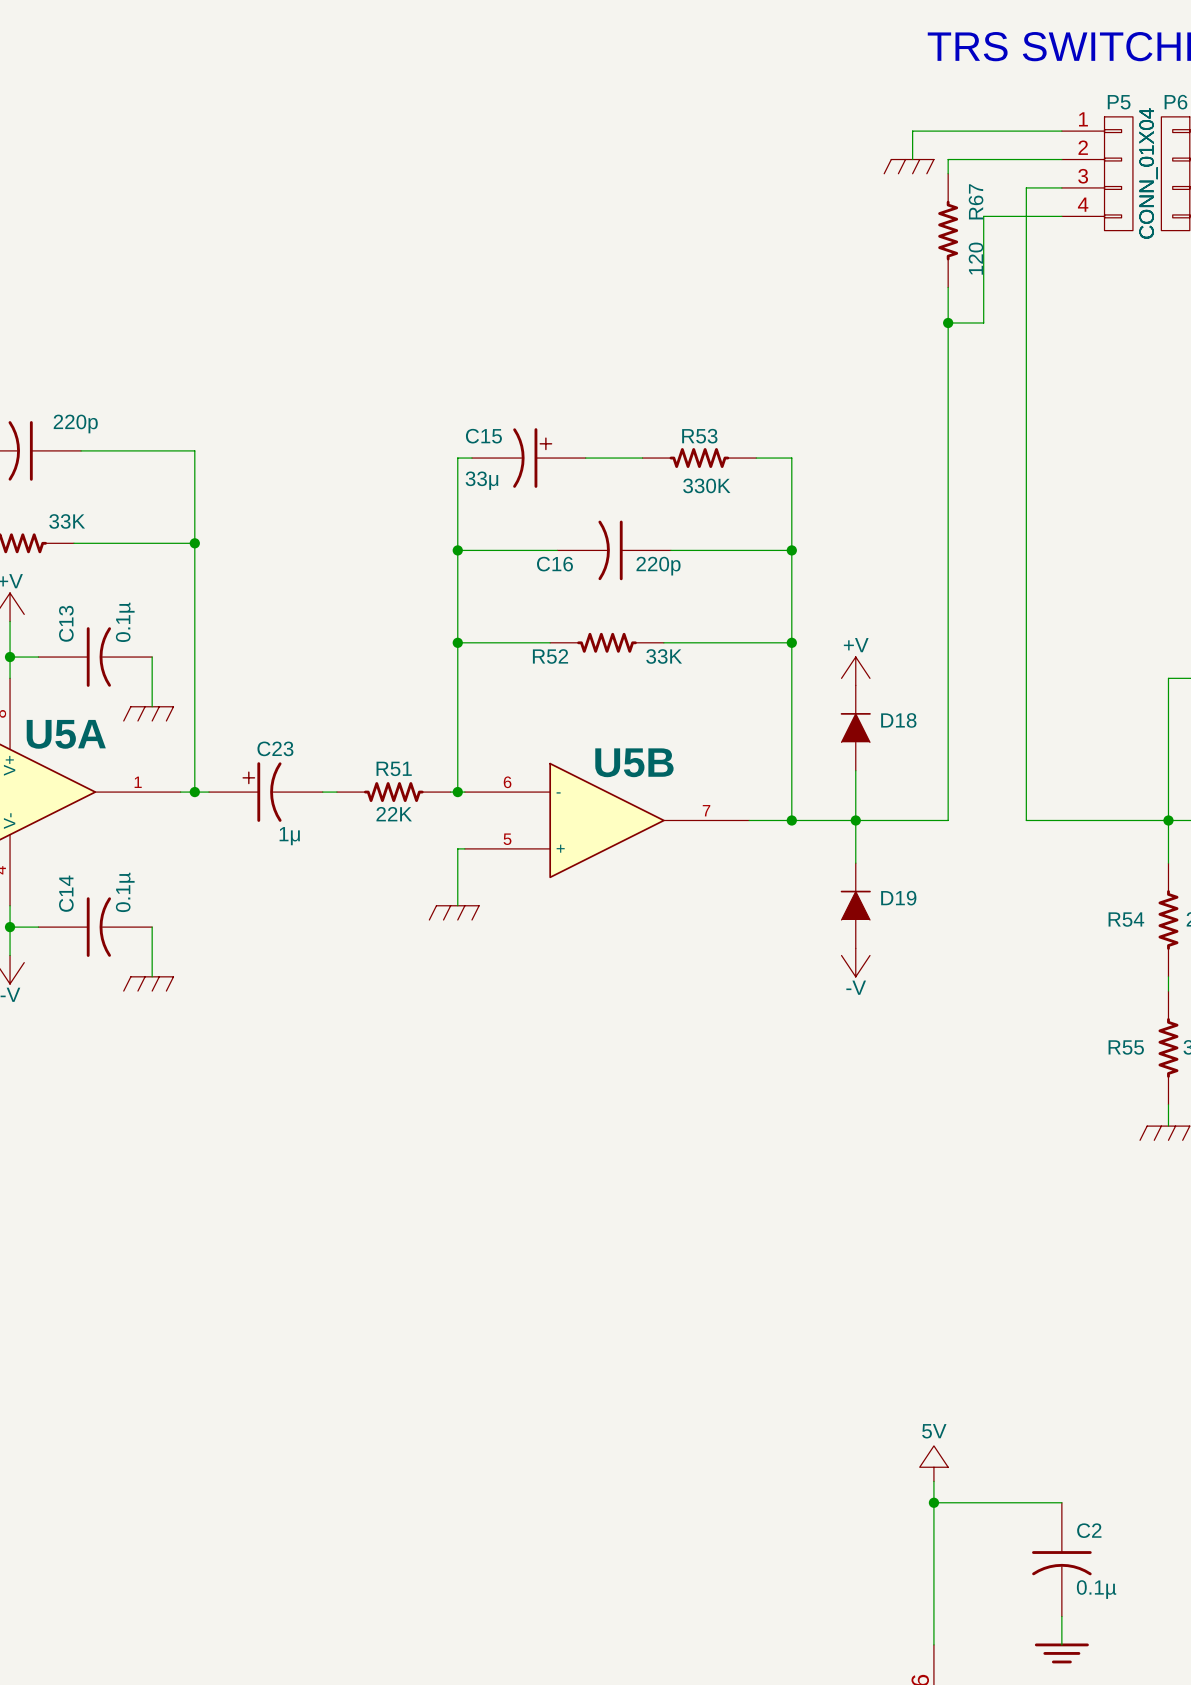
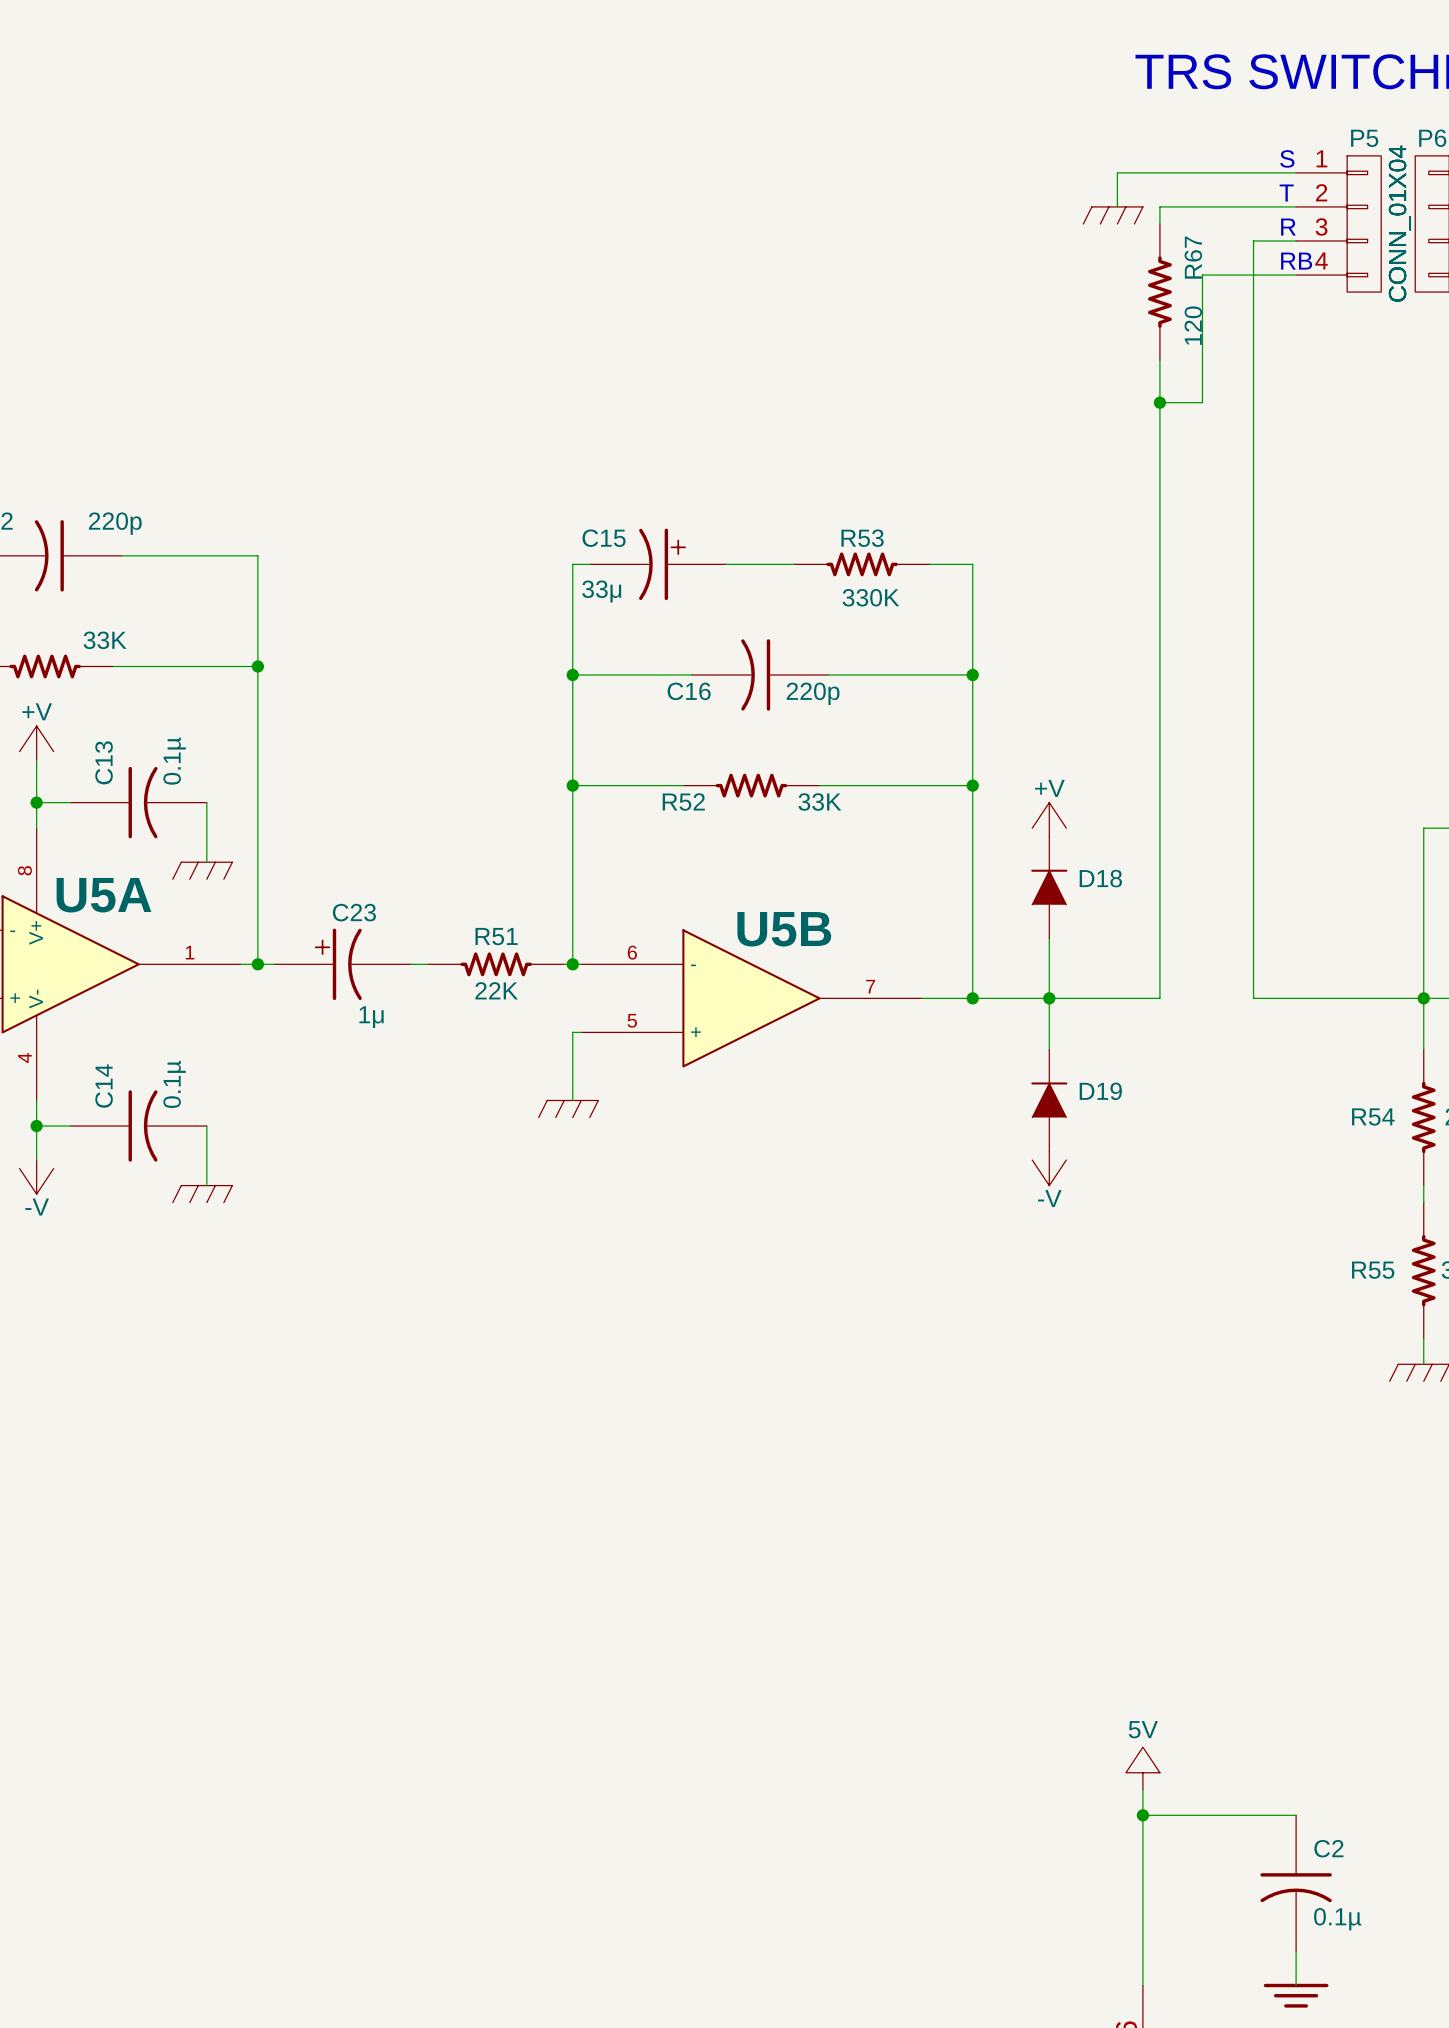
text: none -> S (1287, 158)
text: none -> T (1286, 193)
text: none -> R (1288, 227)
text: none -> RB (1296, 261)

